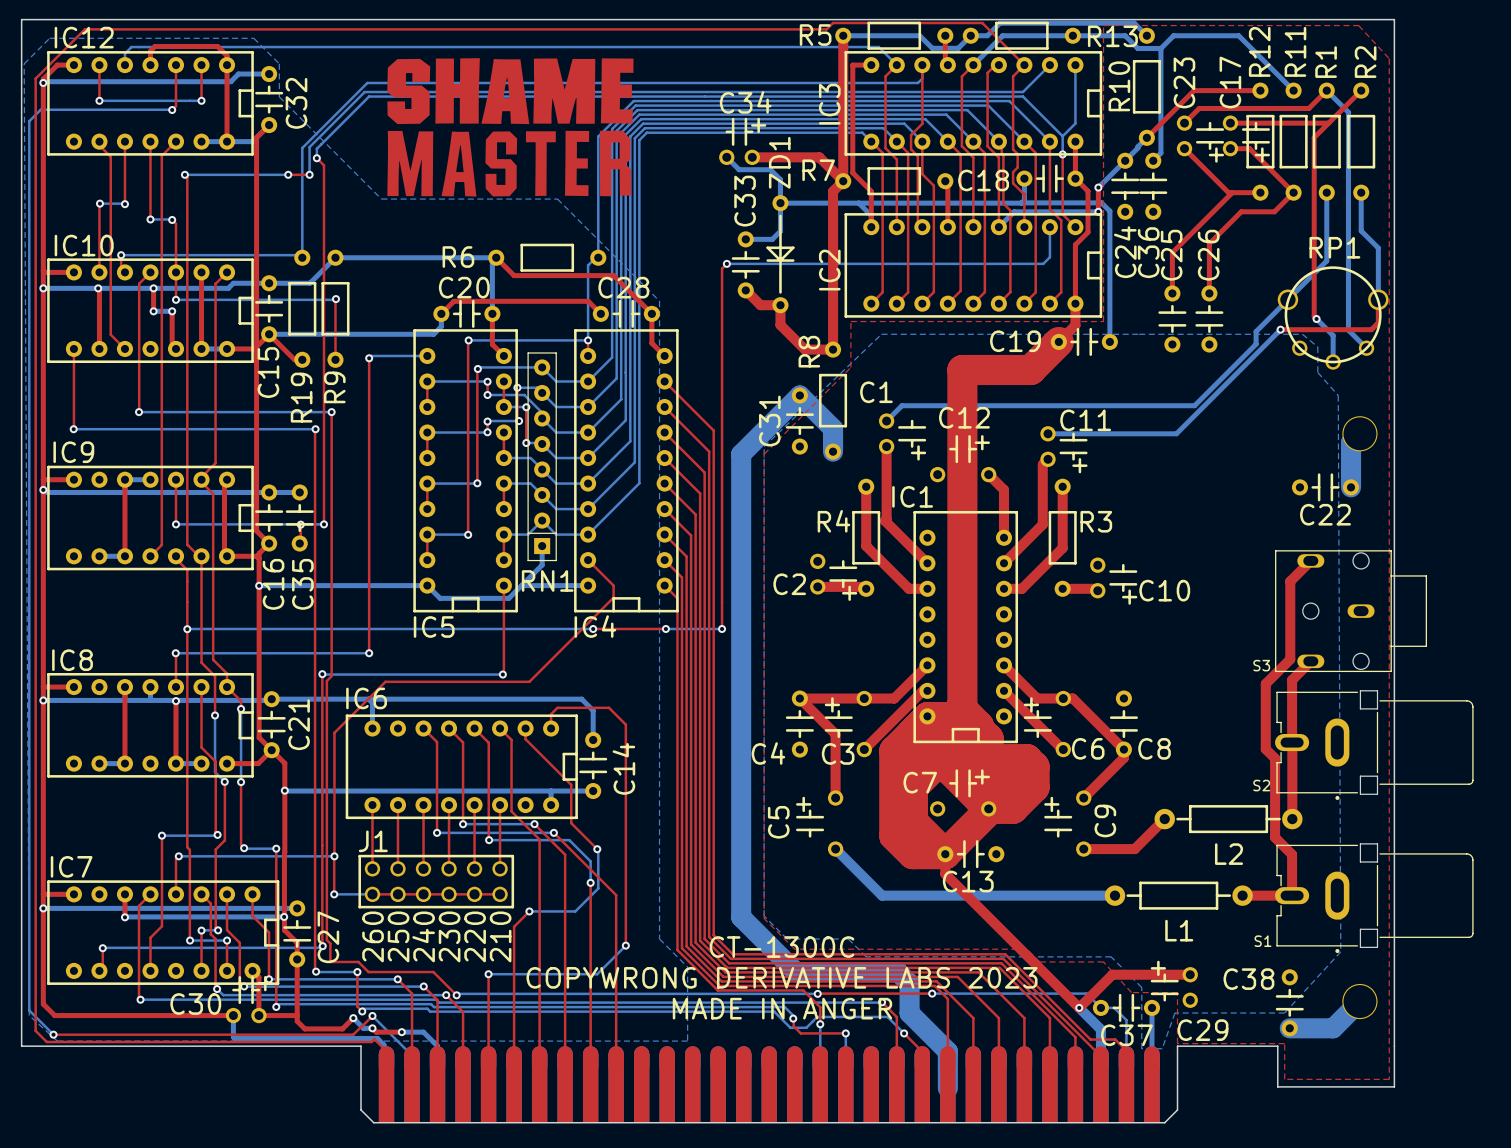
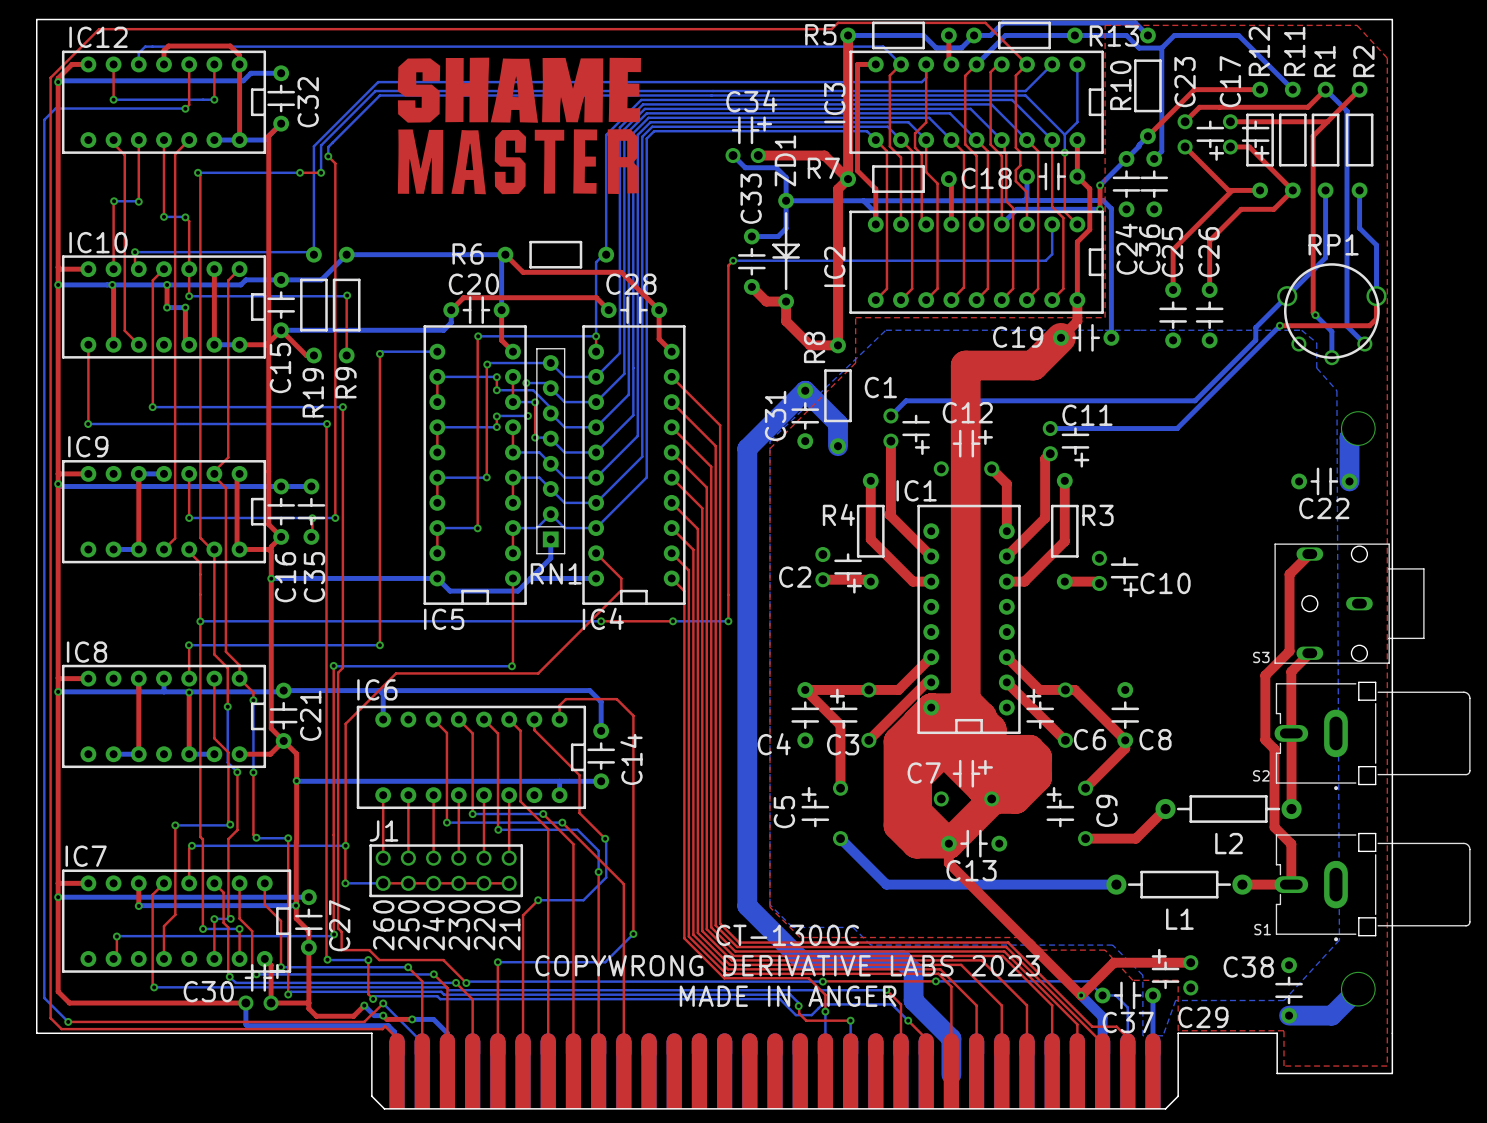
bottom zone outline: (49, 38) (24, 63) (29, 1015) (57, 1041) (687, 1041) (687, 967) (659, 939) (659, 301) (557, 199) (381, 199) (279, 96) (279, 63) (253, 38) (49, 38) -> none

